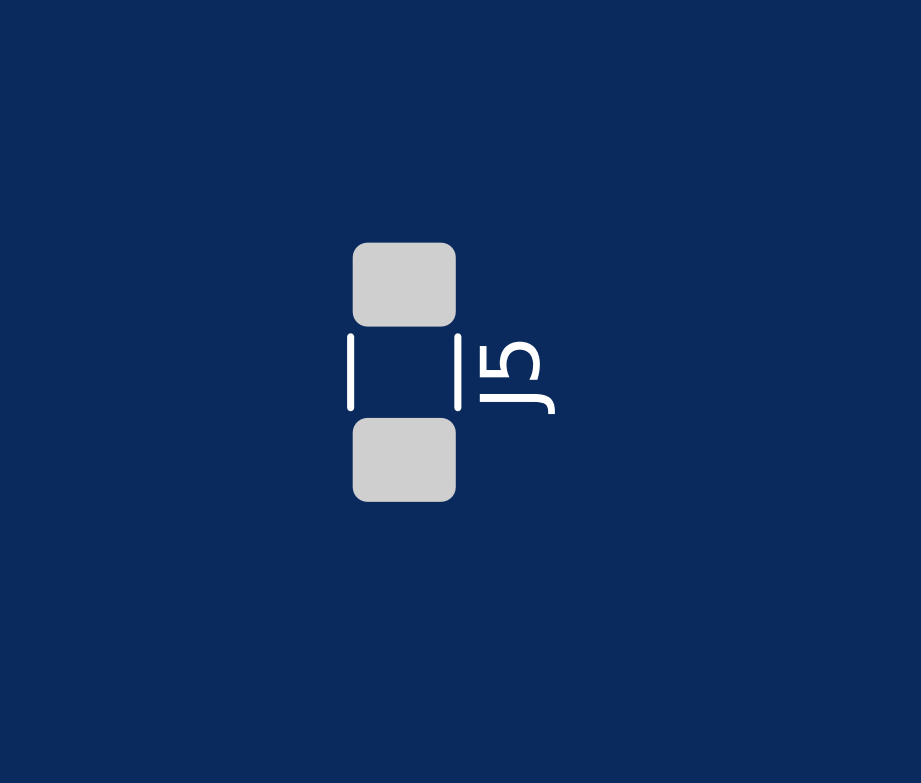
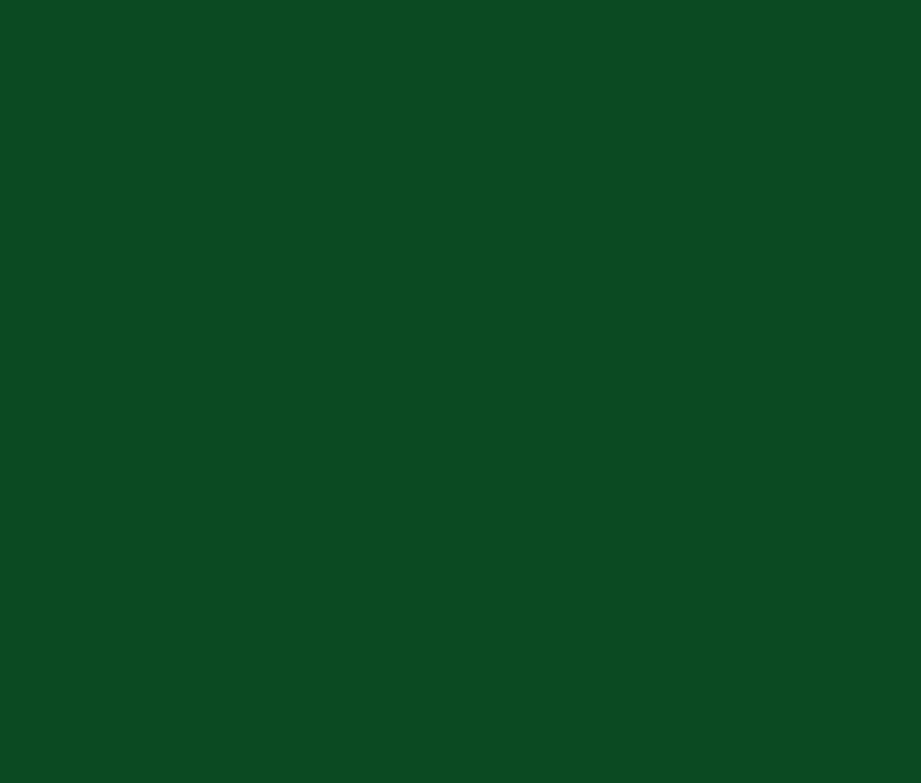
J5: (404, 372) -> none

